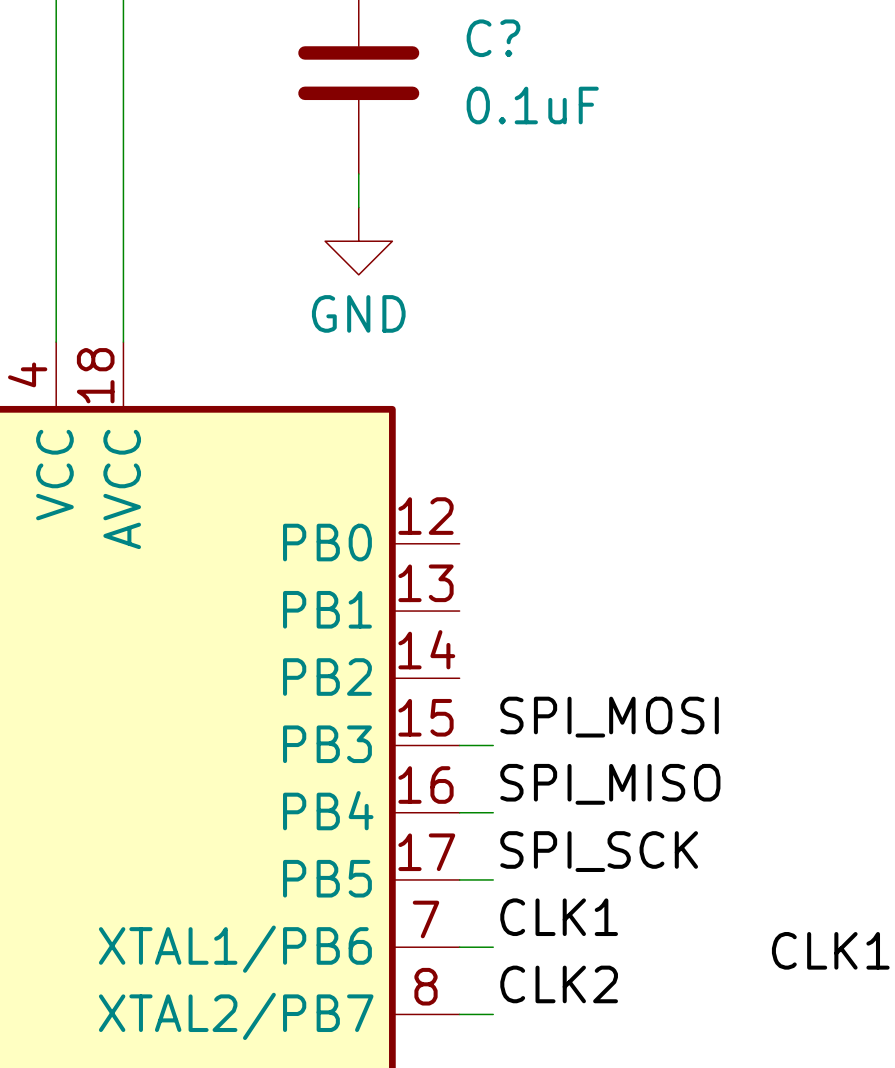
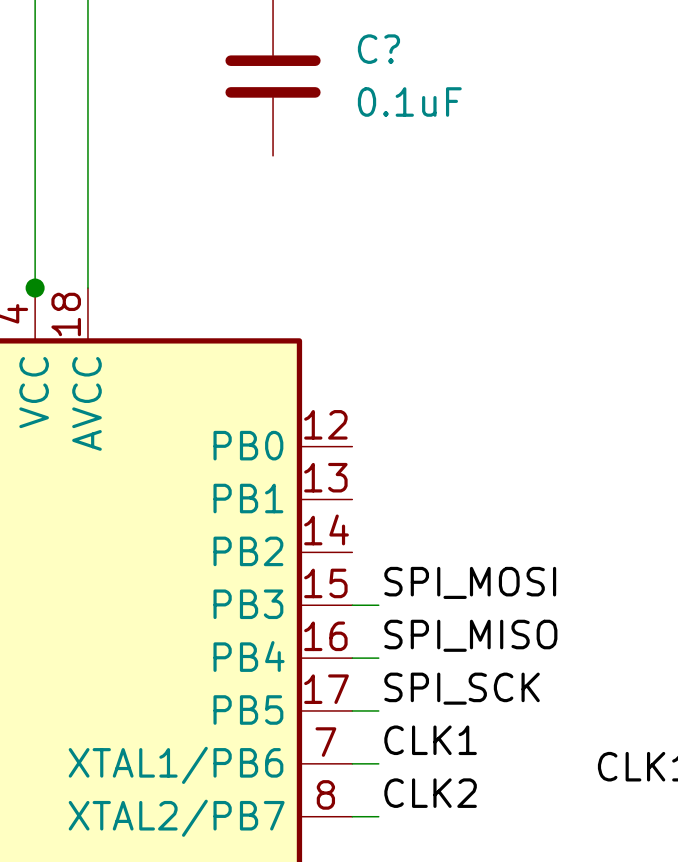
wire: (358, 173) (358, 207) -> none
power symbol: GND (358, 241) -> none
junction: none -> (35, 288)

